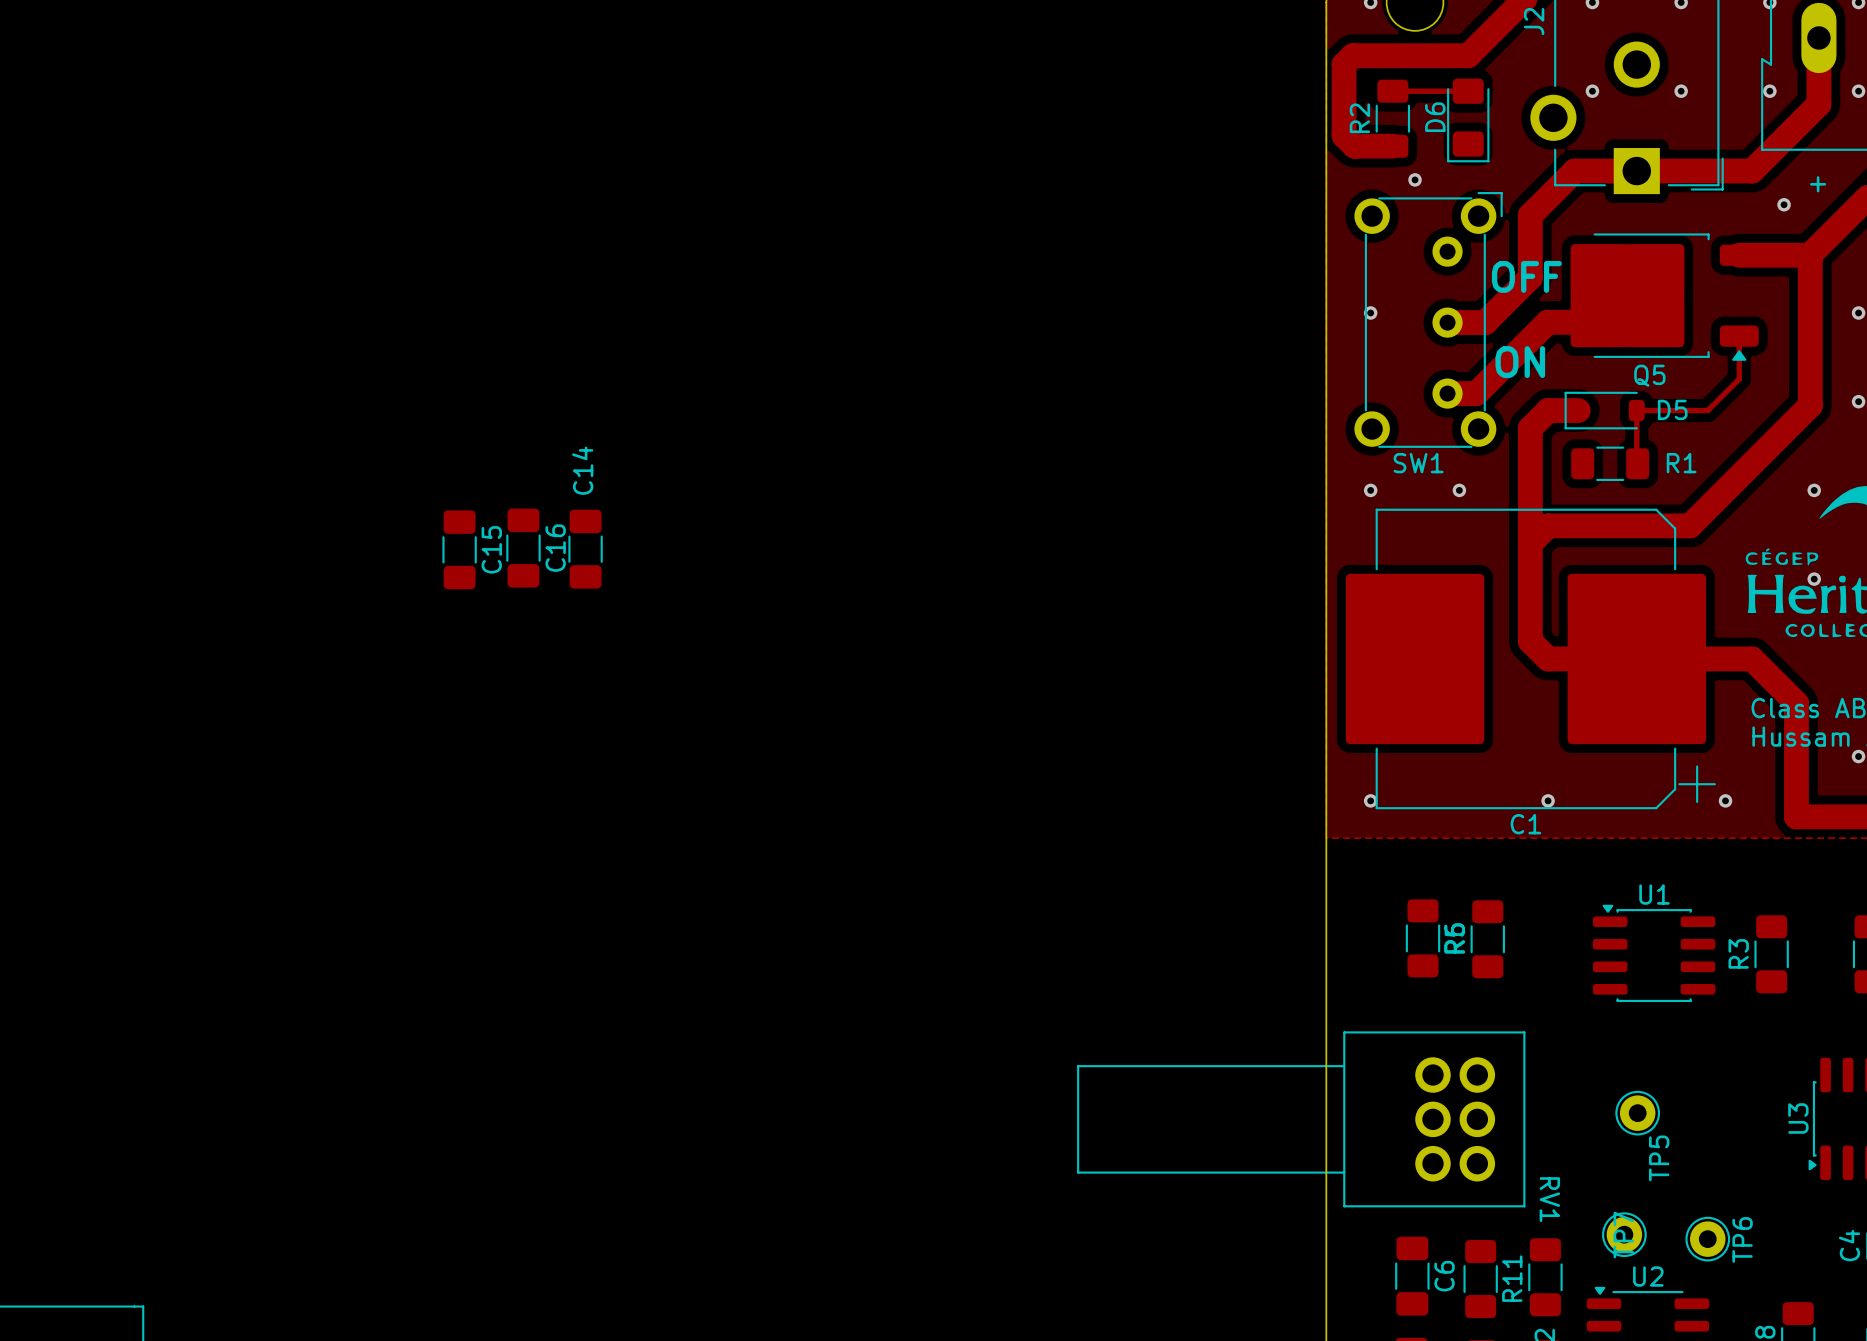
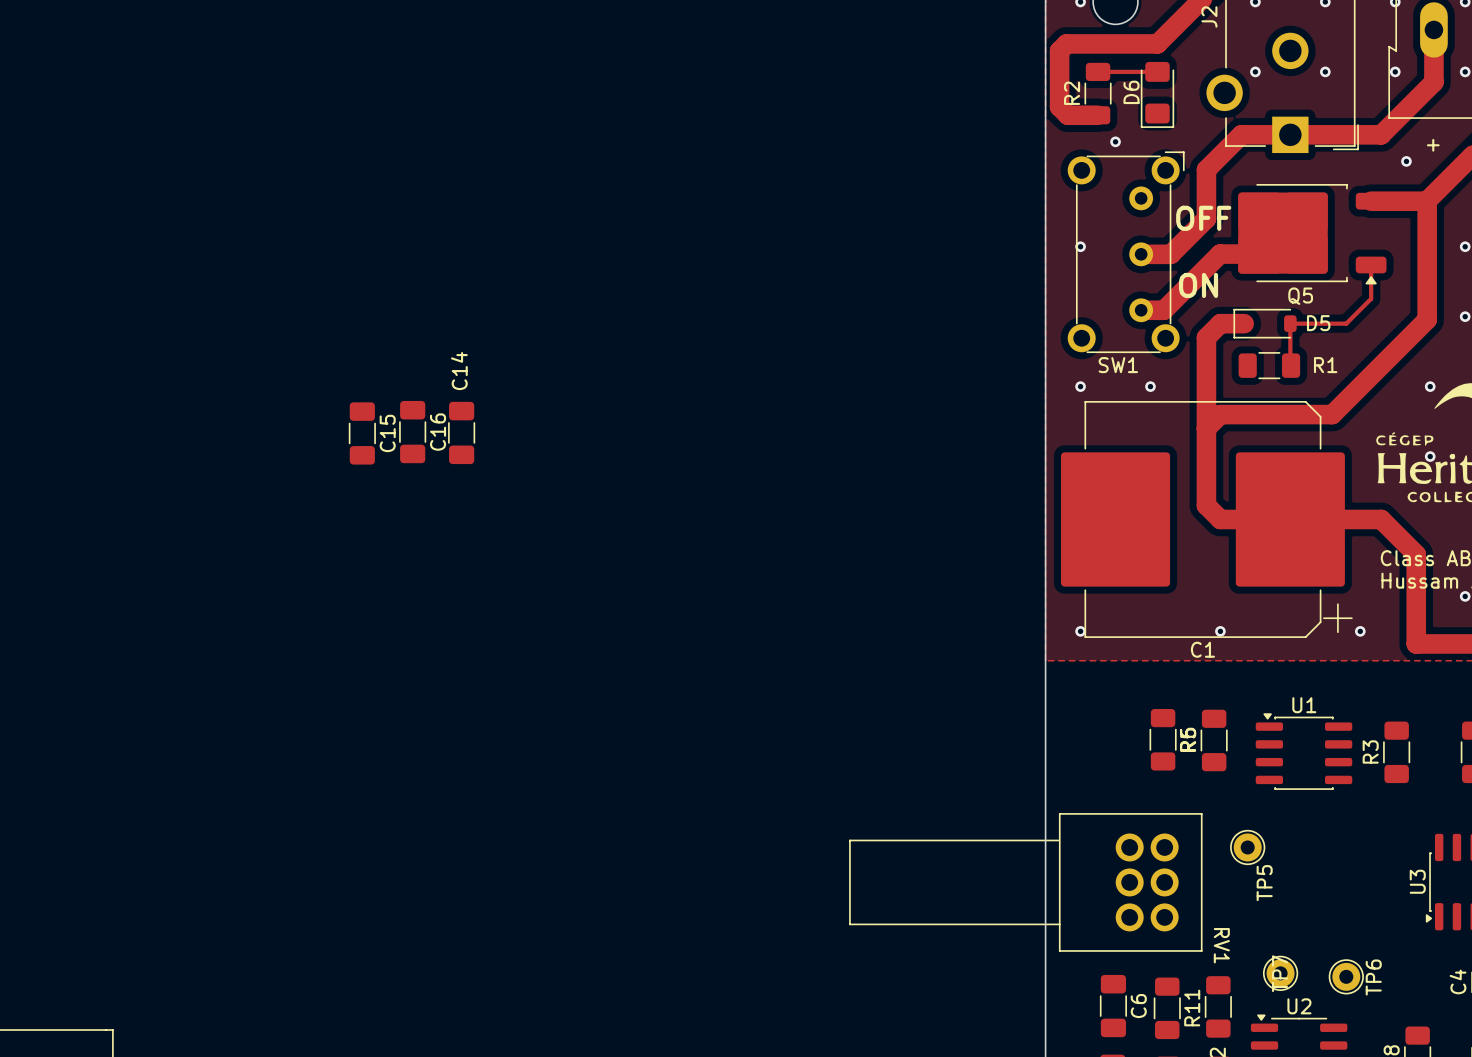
part position: (1423, 938) -> (1163, 739)
part position: (1487, 939) -> (1214, 740)
TP5 position: (1637, 1113) -> (1247, 847)

